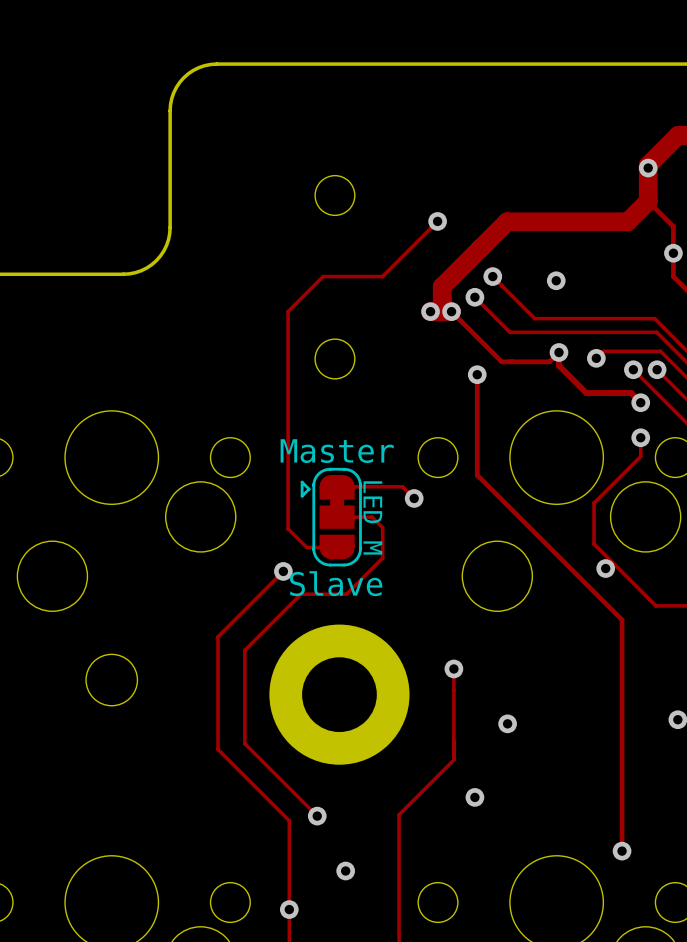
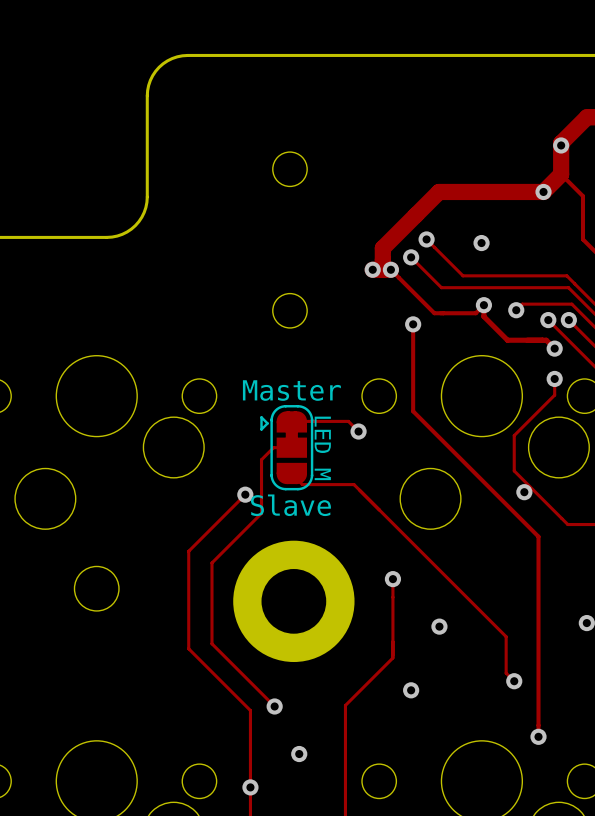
track: (437, 221) (382, 276) (323, 276) (288, 311) (288, 528) (306, 547) (337, 547) -> (514, 681) (506, 673) (506, 636) (354, 484) (302, 484) (291, 473)
via: (437, 221) -> none
via: none -> (543, 191)
via: (673, 253) -> none
track: (337, 517) (372, 517) (382, 527) (382, 558) (346, 594) (300, 594) -> (291, 447) (273, 447) (261, 459) (260, 514)
via: none -> (514, 681)

